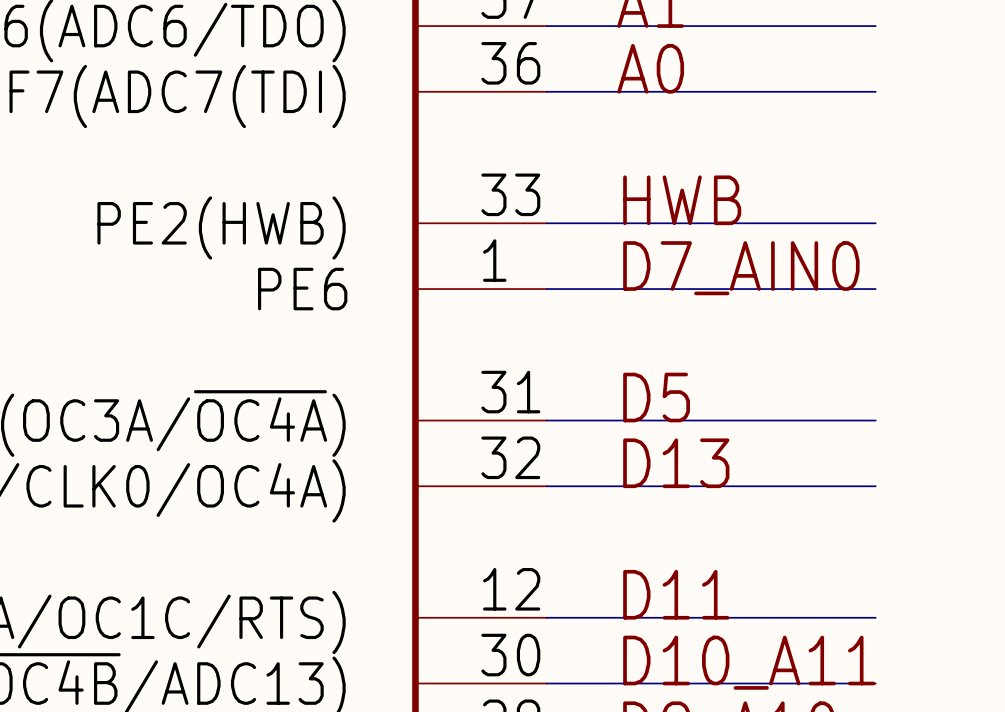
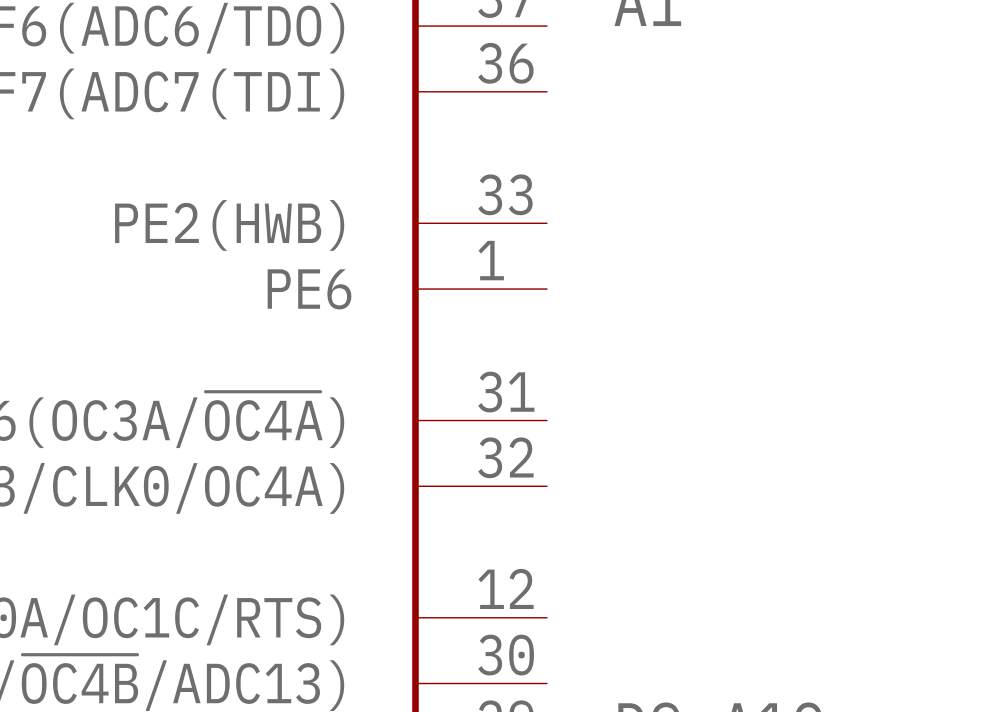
wire: (546, 26) (875, 26) -> none
label: A0 (650, 68) -> none
wire: (546, 91) (875, 91) -> none
label: HWB (682, 200) -> none
wire: (546, 223) (875, 223) -> none
label: D7_AIN0 (741, 268) -> none
wire: (546, 289) (875, 289) -> none
label: D5 (656, 397) -> none
wire: (546, 420) (875, 420) -> none
label: D13 (676, 463) -> none
wire: (546, 486) (875, 486) -> none
label: D11 (676, 594) -> none
wire: (546, 617) (875, 617) -> none
label: D10_A11 (749, 662) -> none
wire: (546, 683) (875, 683) -> none

